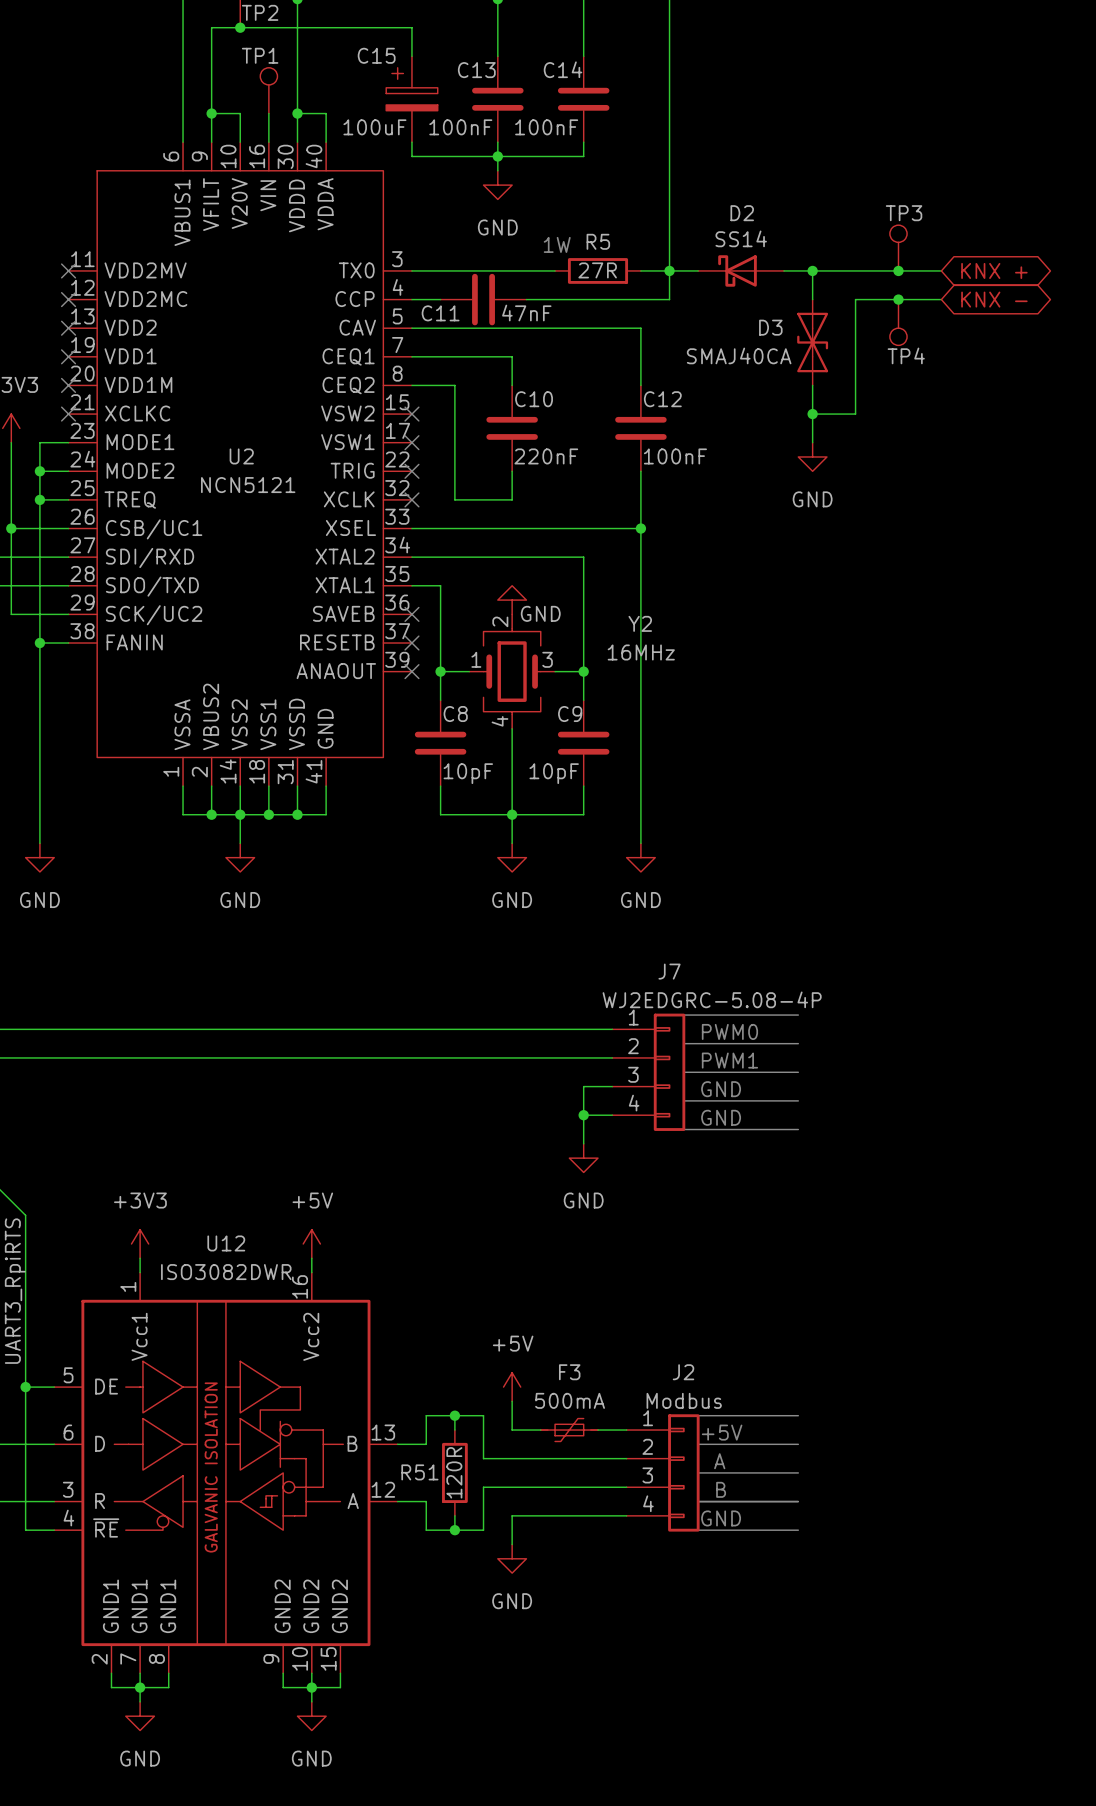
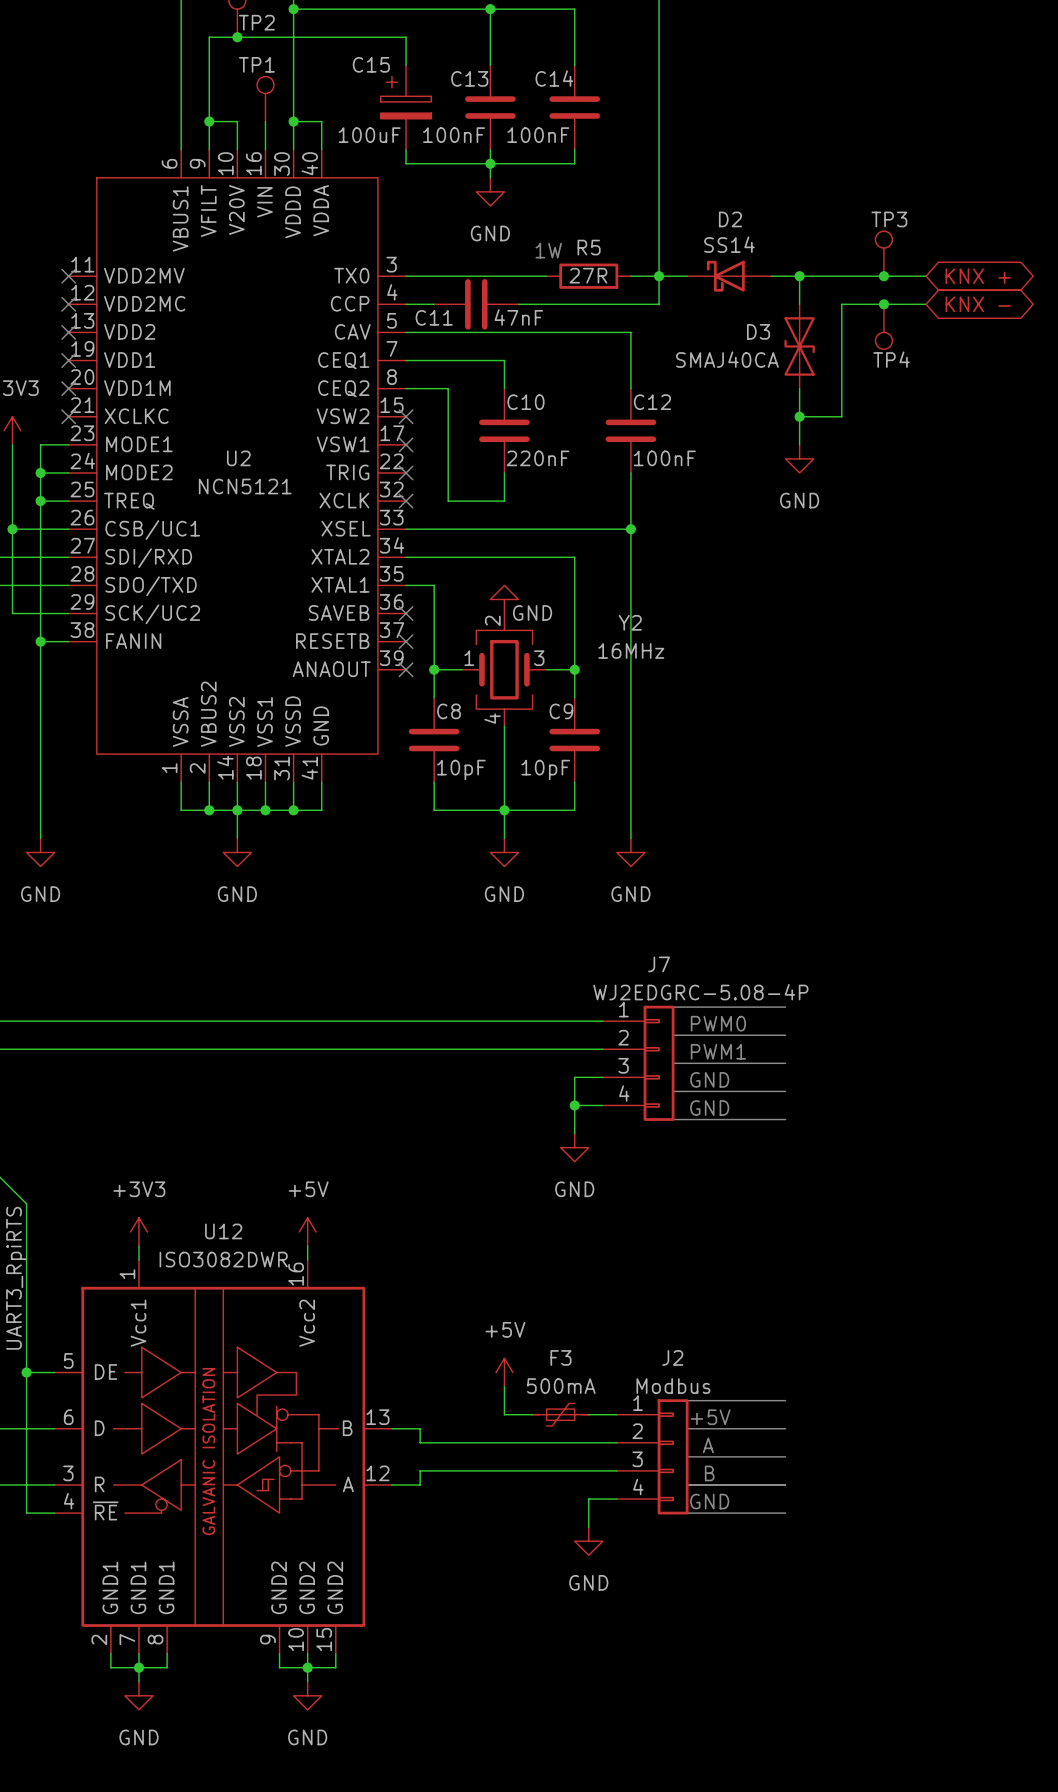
wire: (454, 1415) (454, 1430) -> none
junction: (454, 1415) -> none
wire: (426, 1444) (426, 1415) (483, 1415) (483, 1458) -> (420, 1428) (420, 1442) (476, 1442)
R51: 120R (454, 1472) -> none
wire: (483, 1487) (483, 1530) (426, 1530) (426, 1501) -> (476, 1470) (420, 1470) (420, 1484)
wire: (454, 1515) (454, 1530) -> none
wire: (597, 1515) (512, 1515) (512, 1544) -> (588, 1499) (588, 1527)
junction: (454, 1530) -> none
power symbol position: GND (512, 1558) -> GND (588, 1541)

